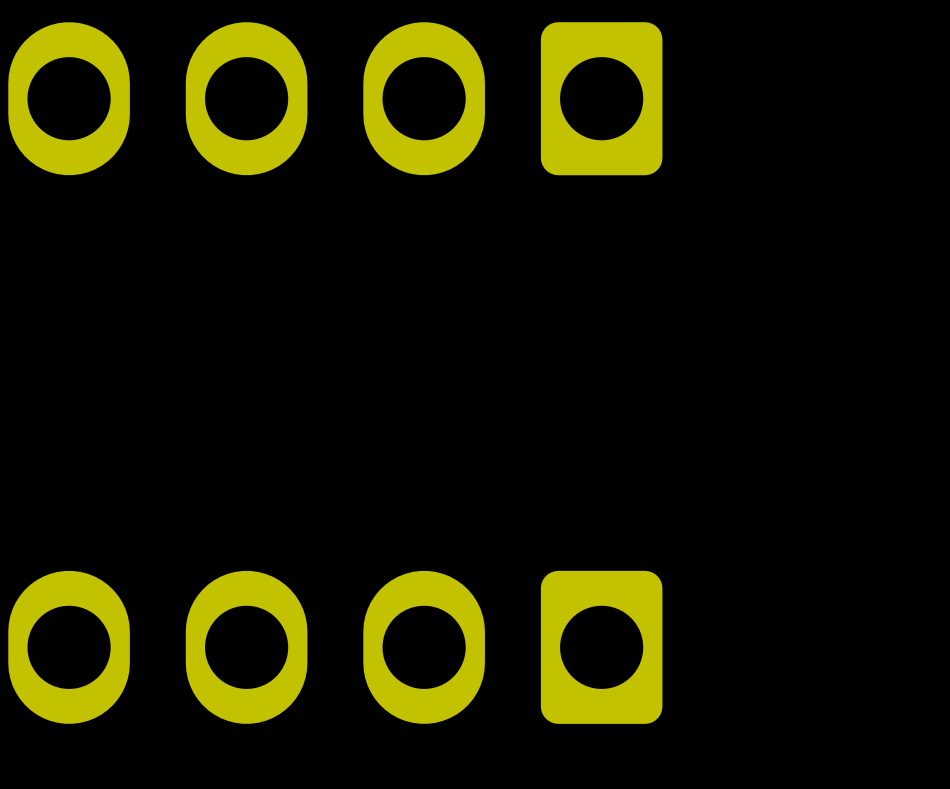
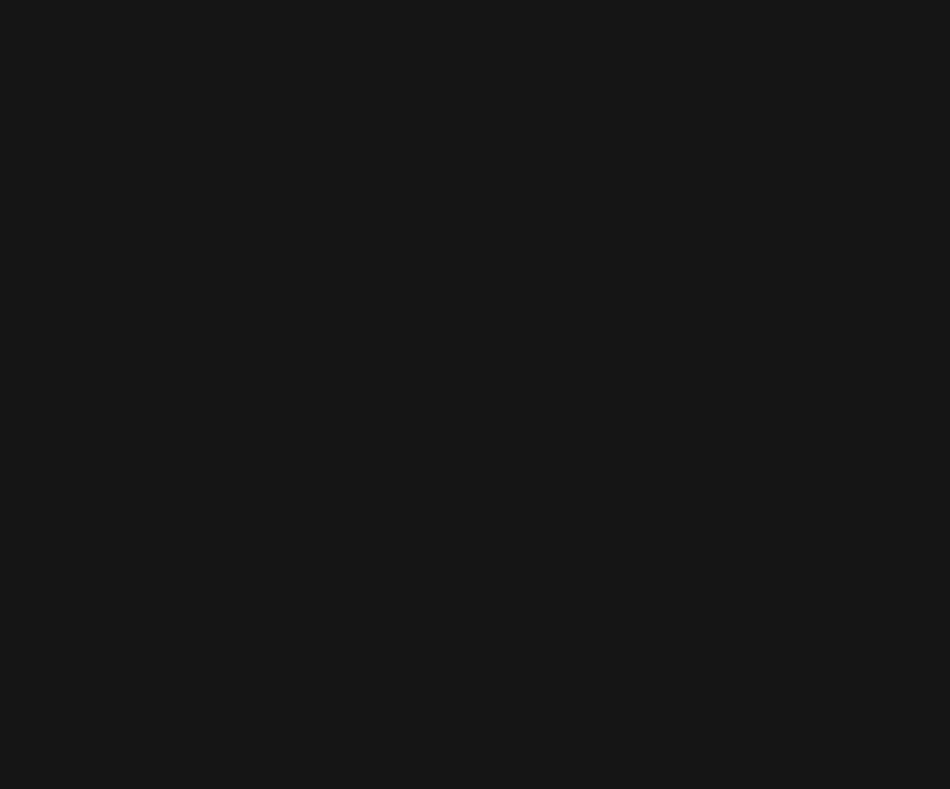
part: (335, 98) -> none
part: (335, 647) -> none

